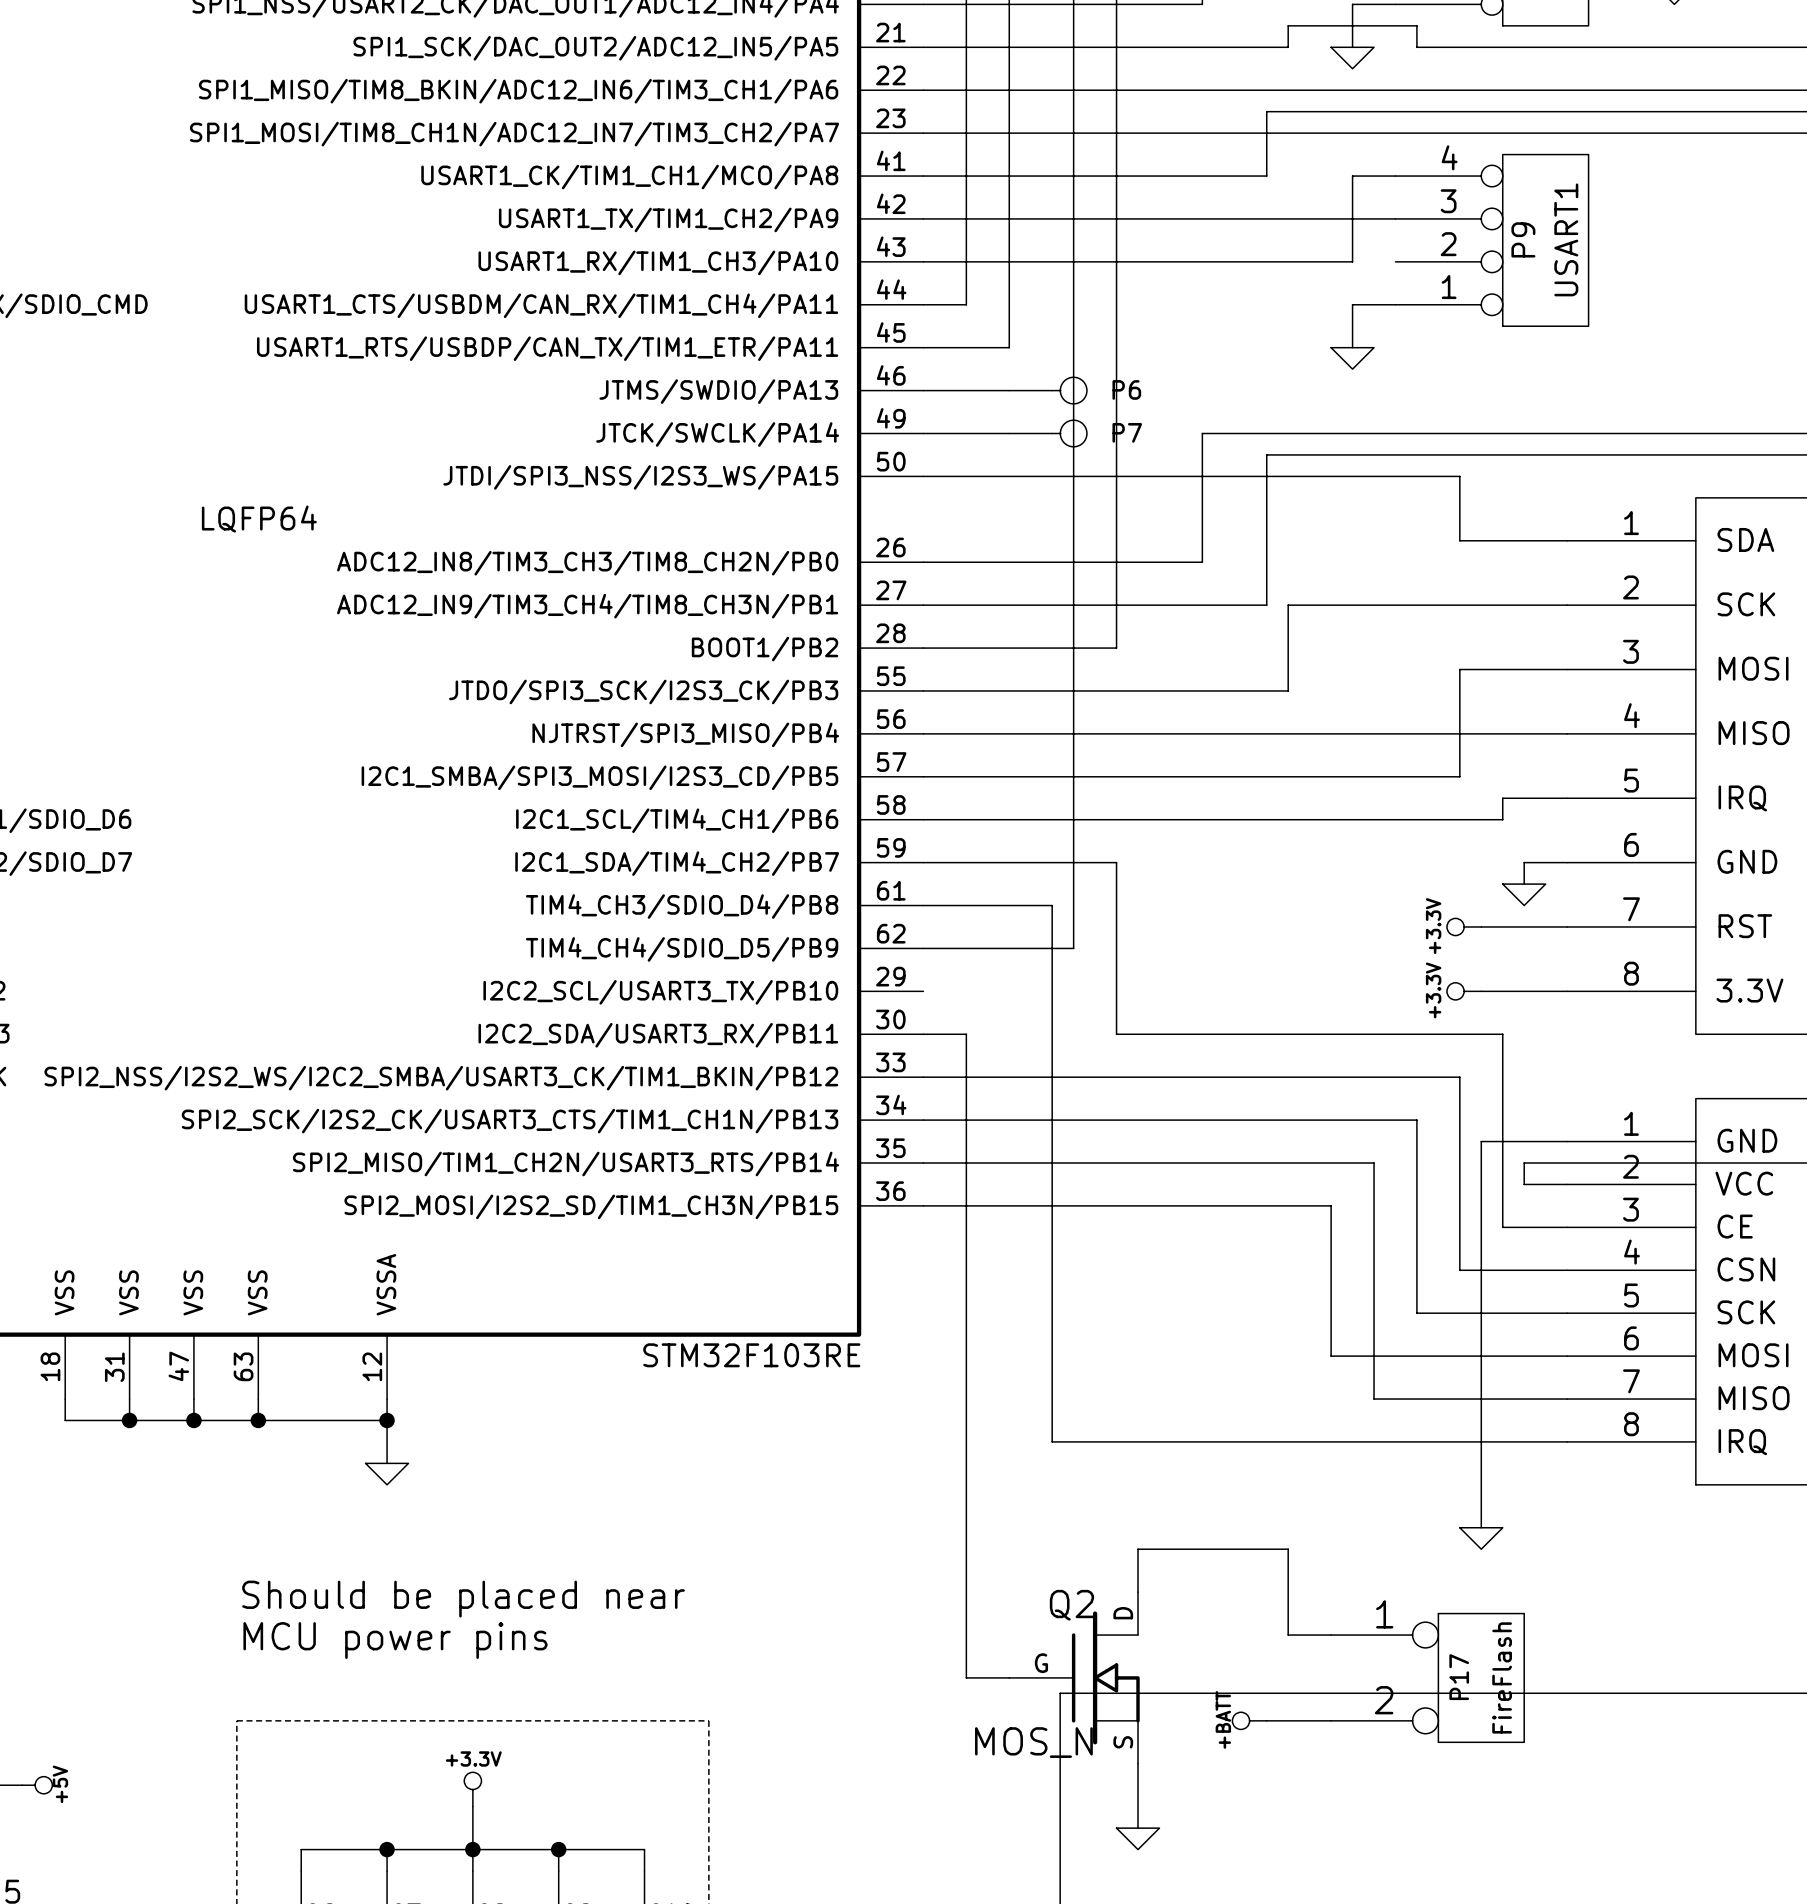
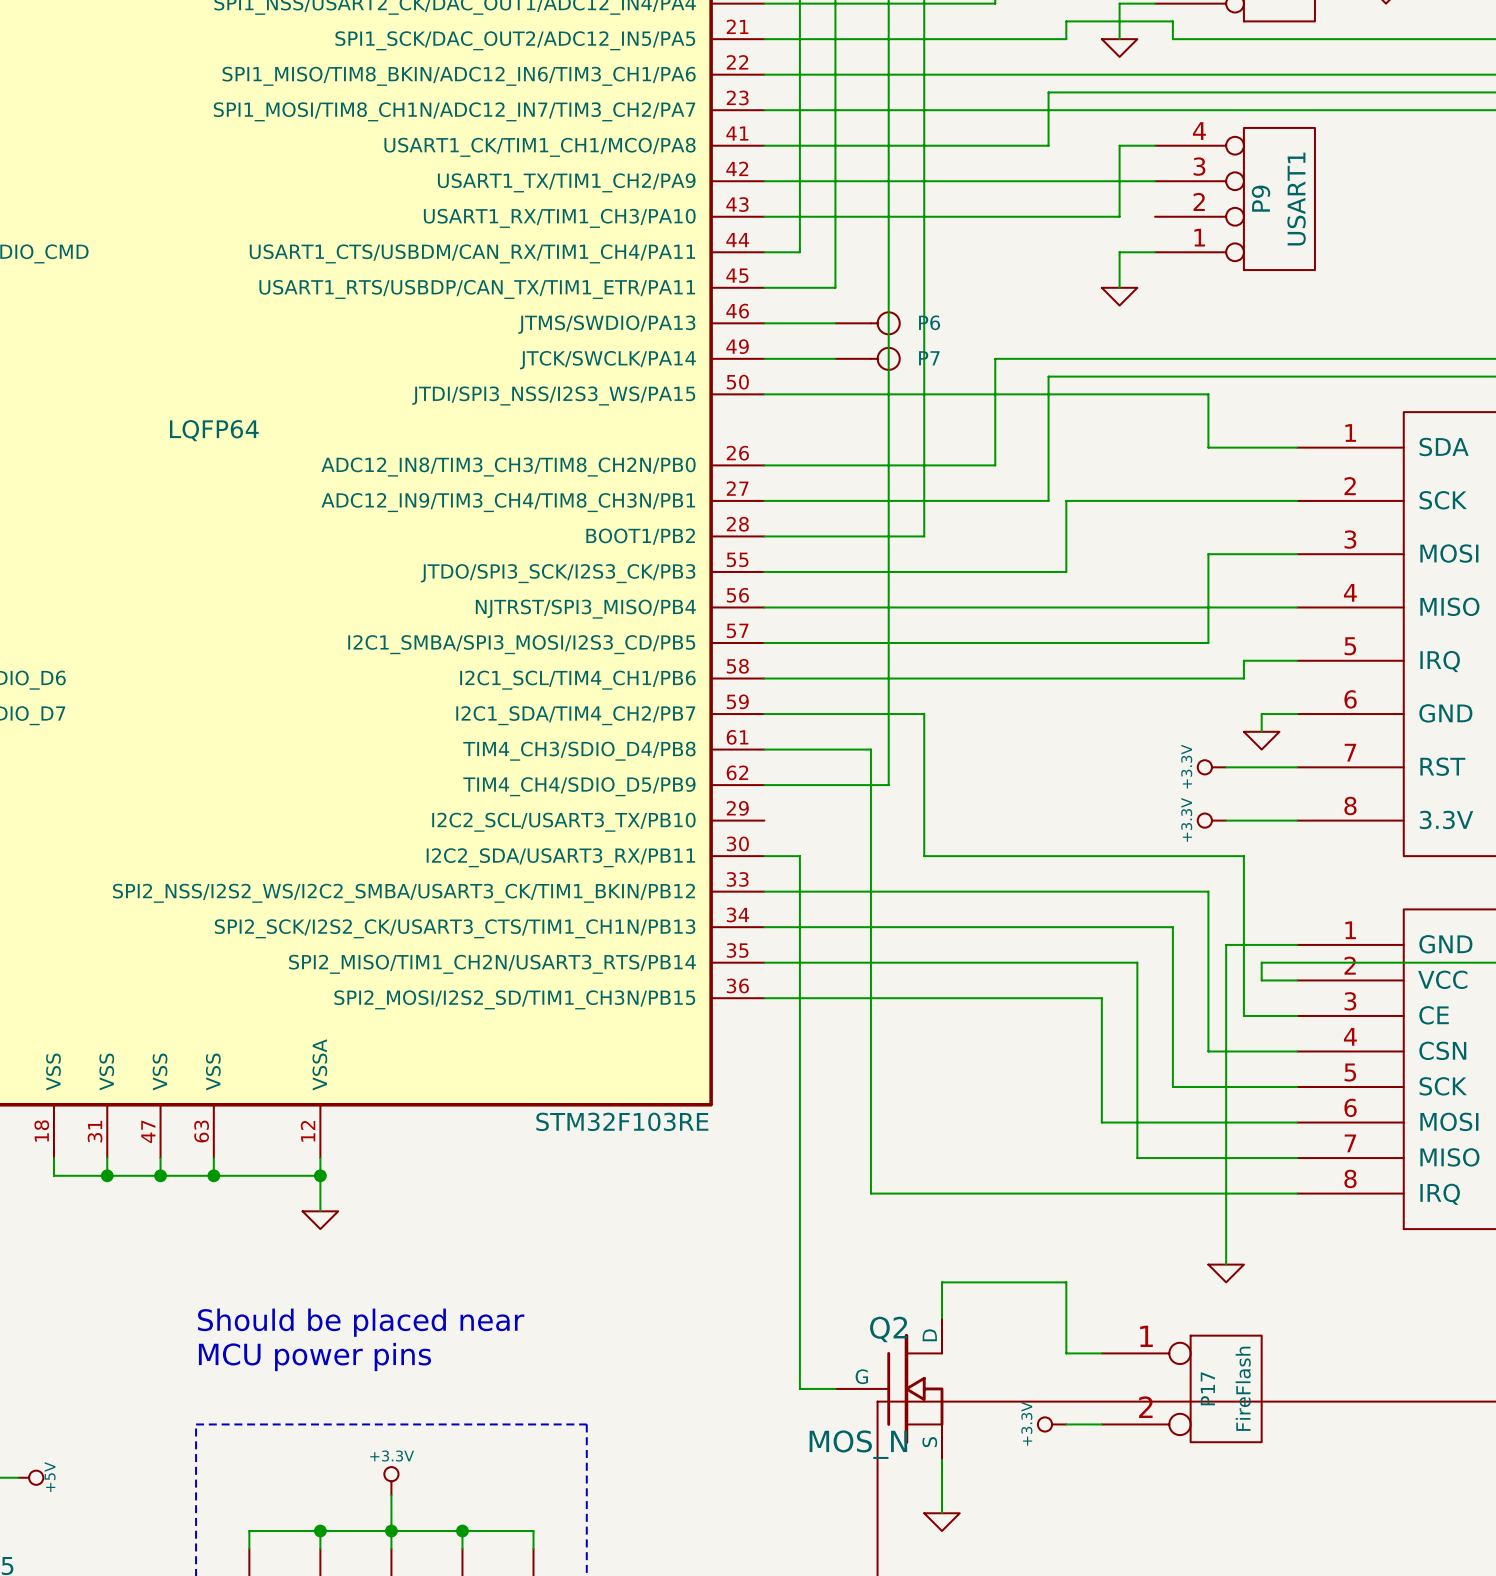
power symbol: +BATT (1249, 1720) -> none
power symbol: none -> +3.3V (1052, 1424)

